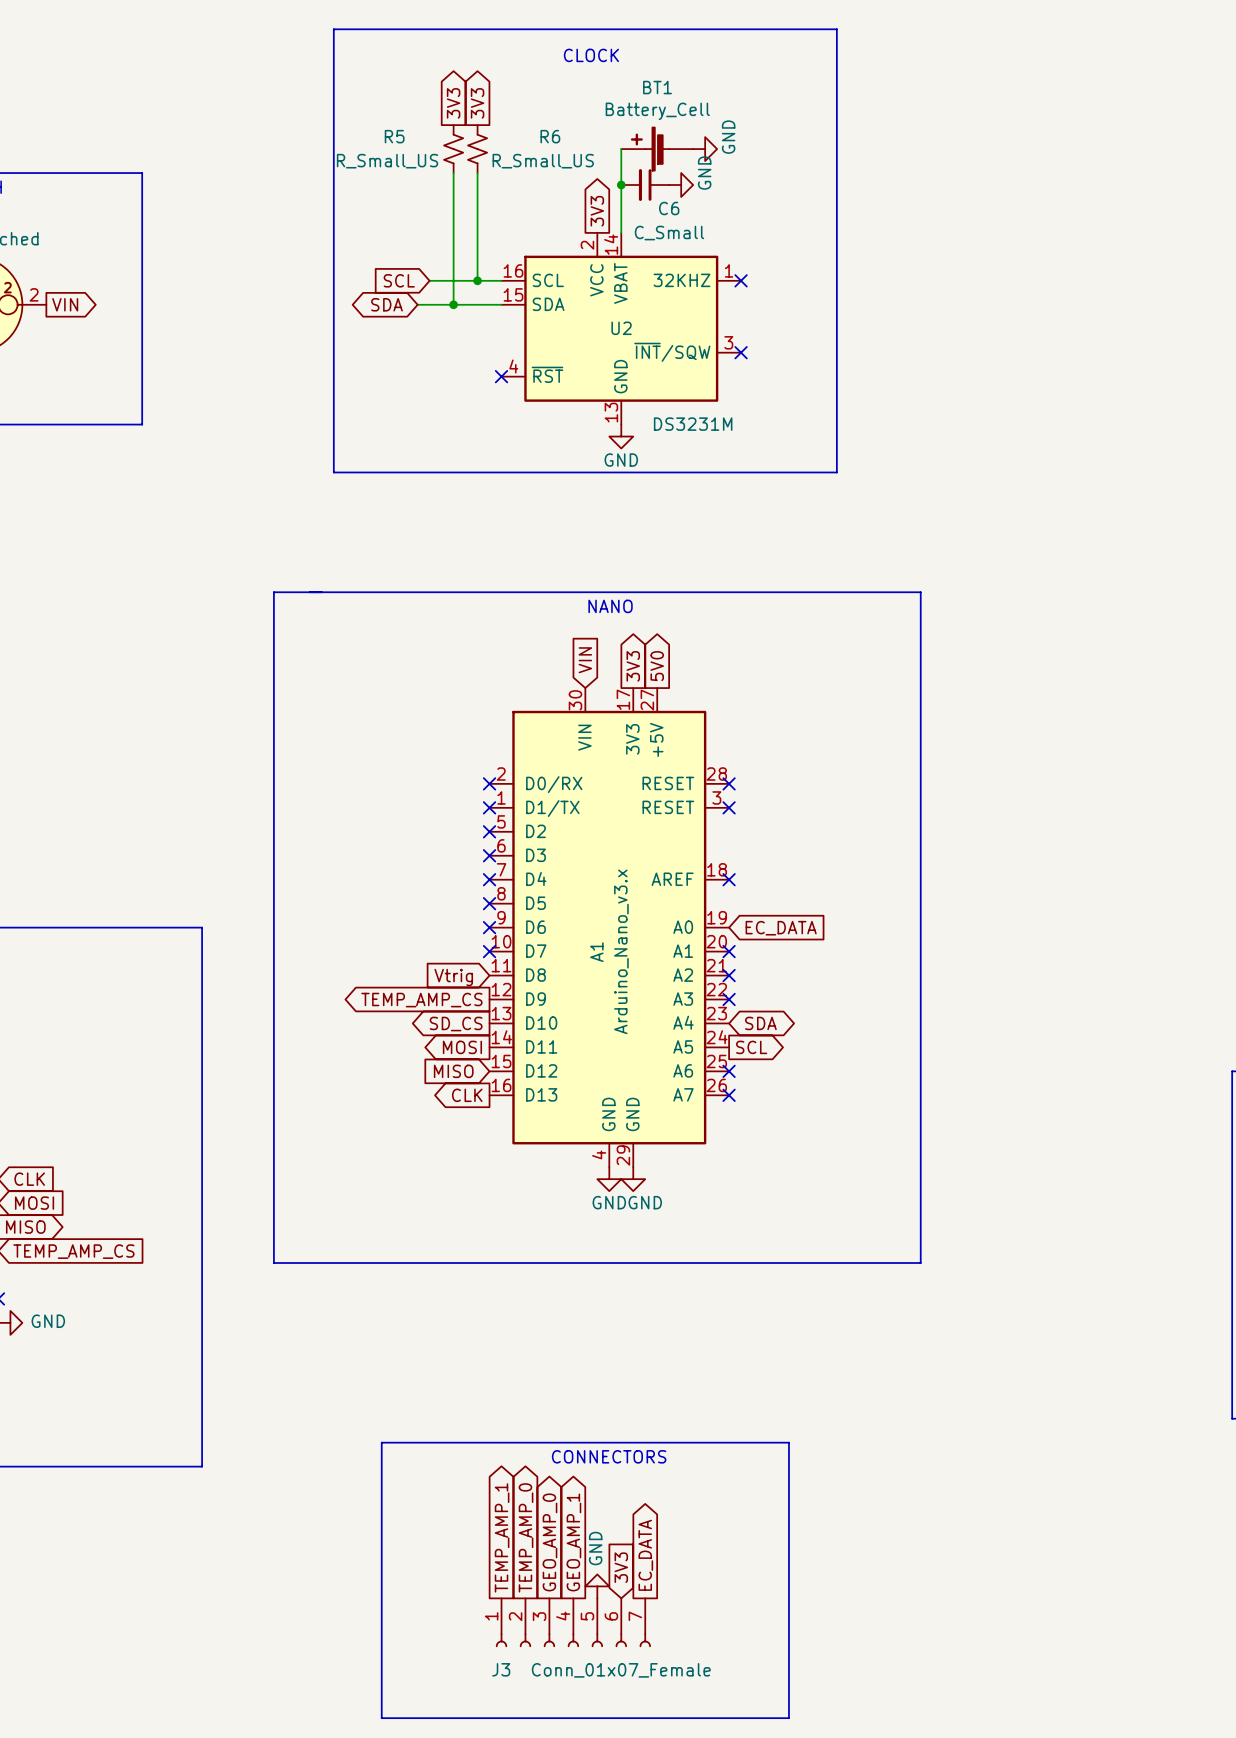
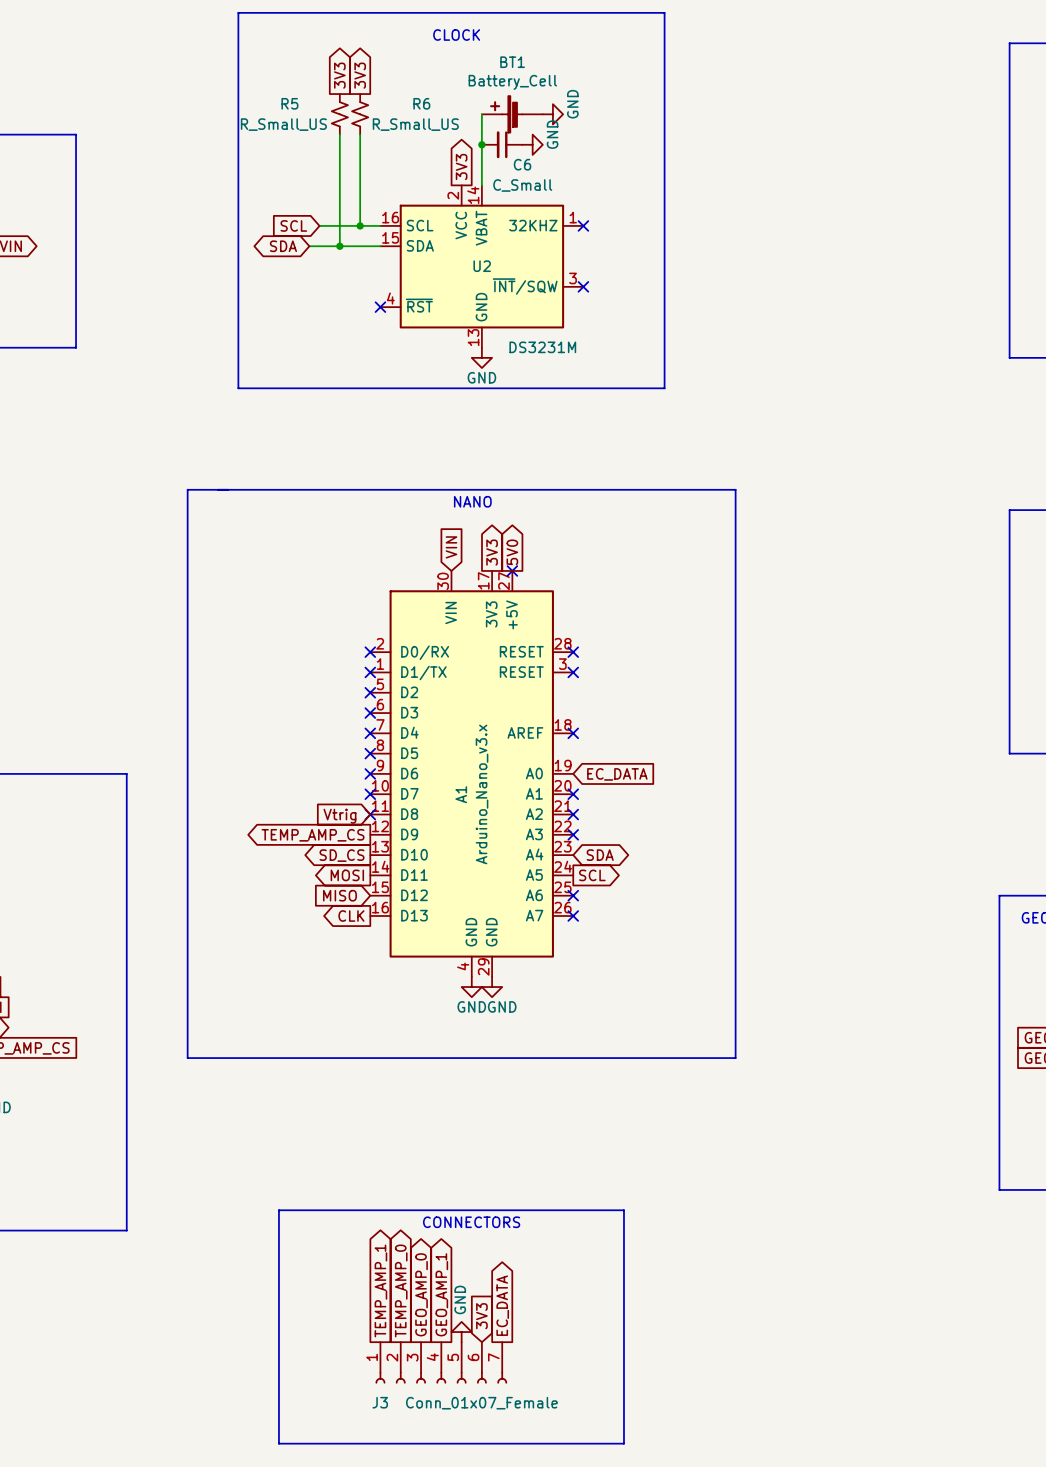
no-connect mark: none -> (512, 570)
no-connect mark: none -> (370, 814)

